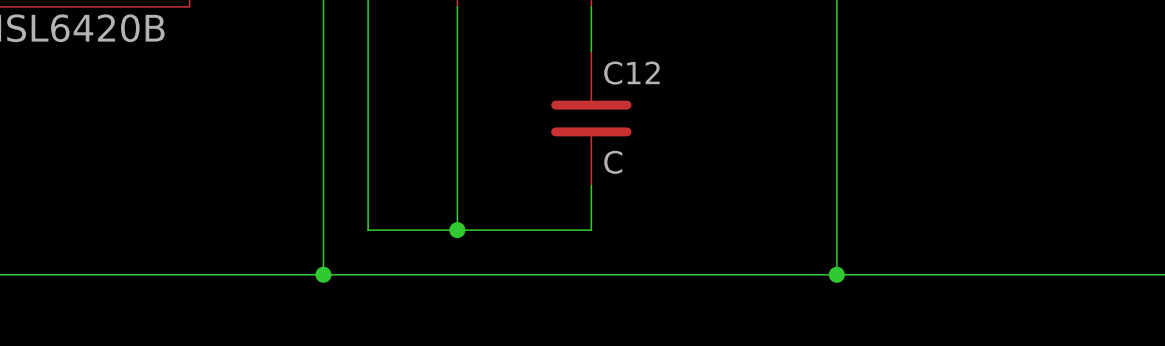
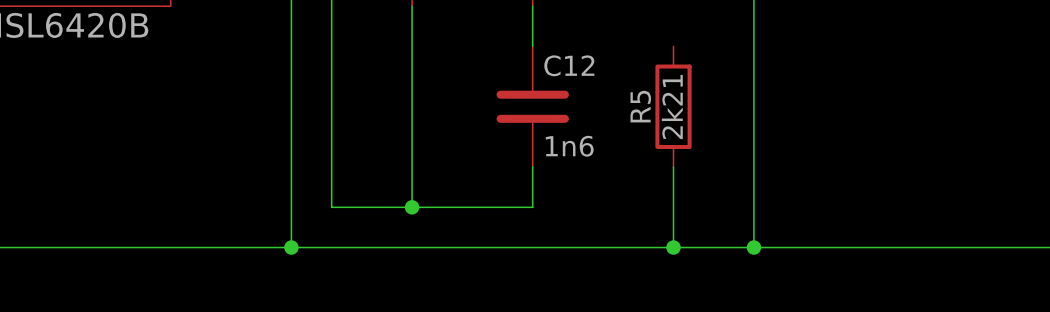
R5: none -> 2k21 (673, 106)
C12 value: C (613, 162) -> 1n6 (569, 146)
wire: none -> (673, 167) (673, 247)
junction: none -> (673, 247)

